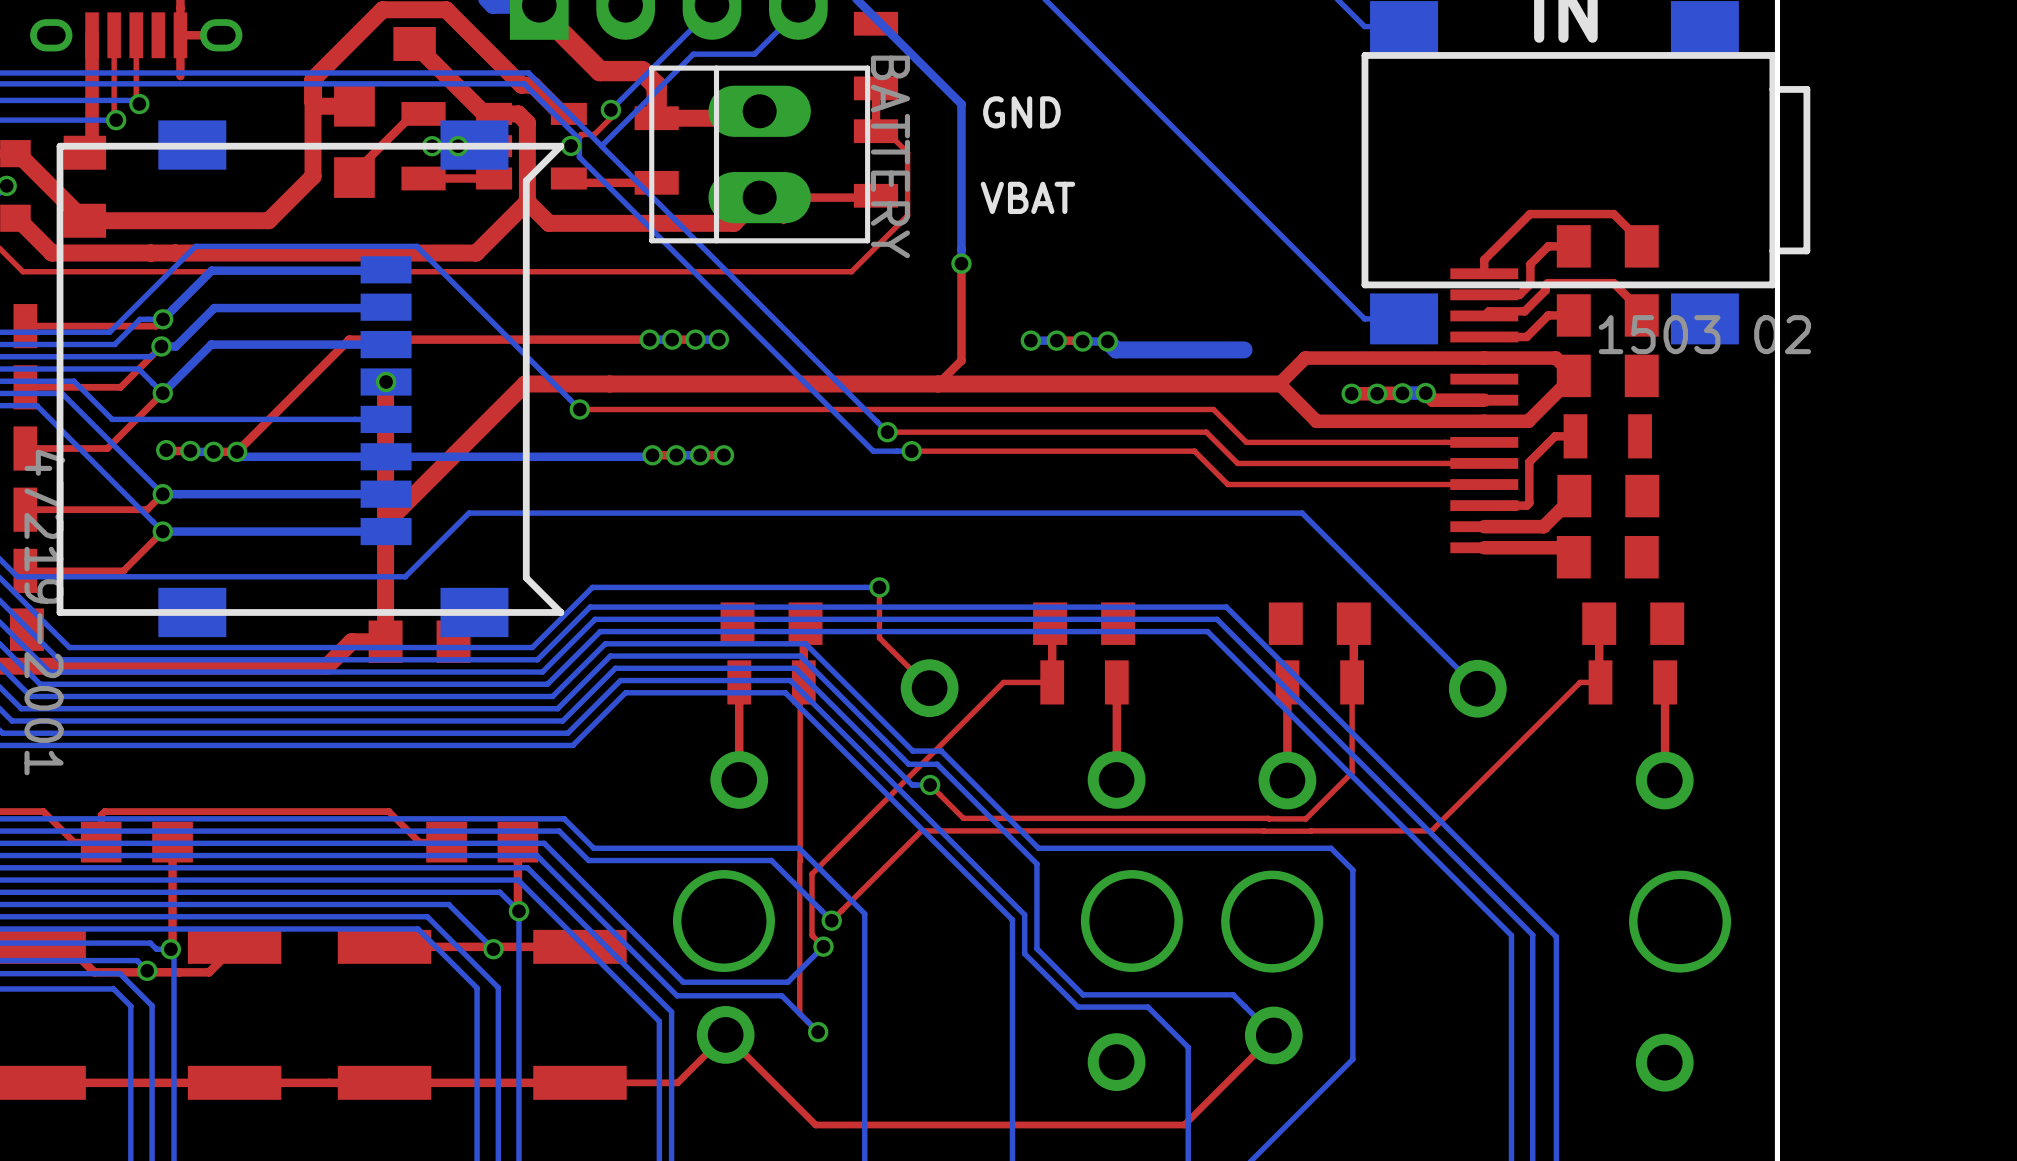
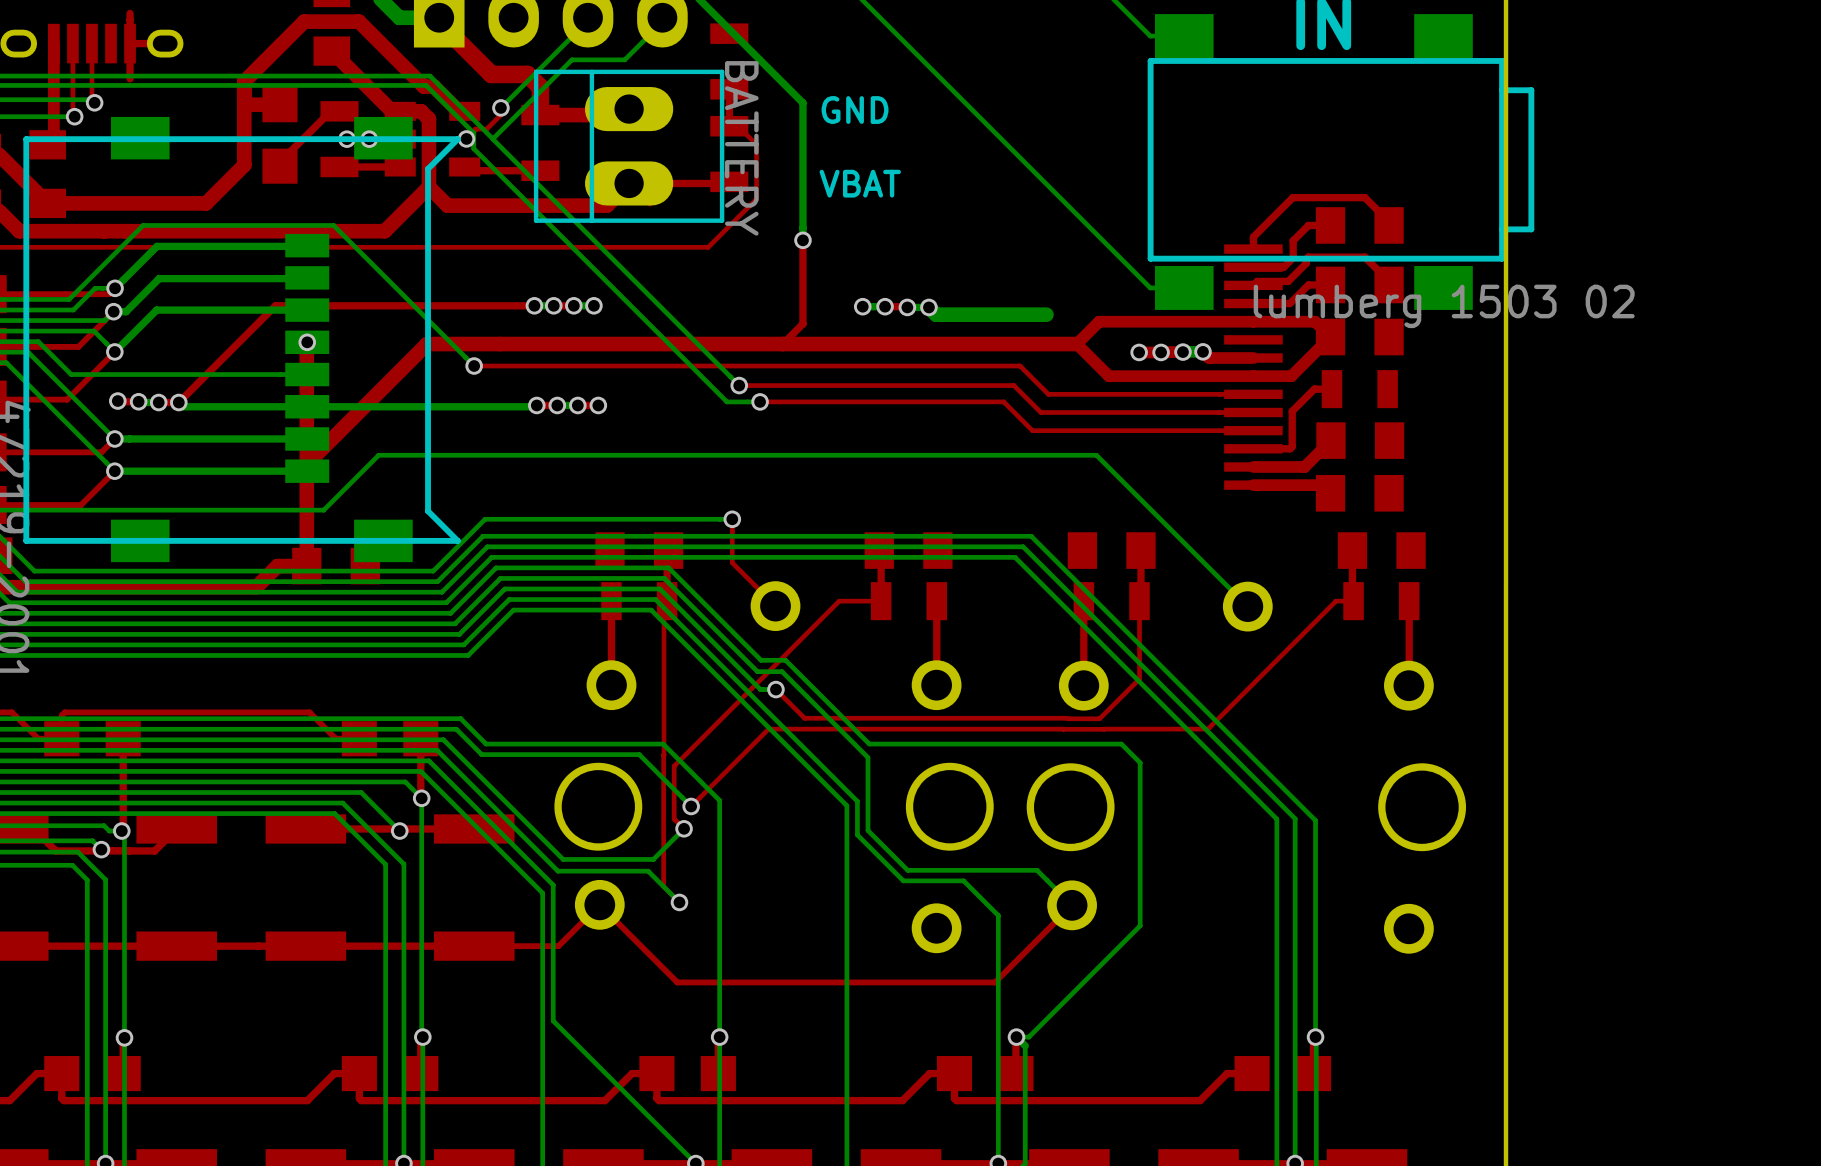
part value: 1503 02 (1704, 334) -> lumberg 1503 02 (1444, 306)

